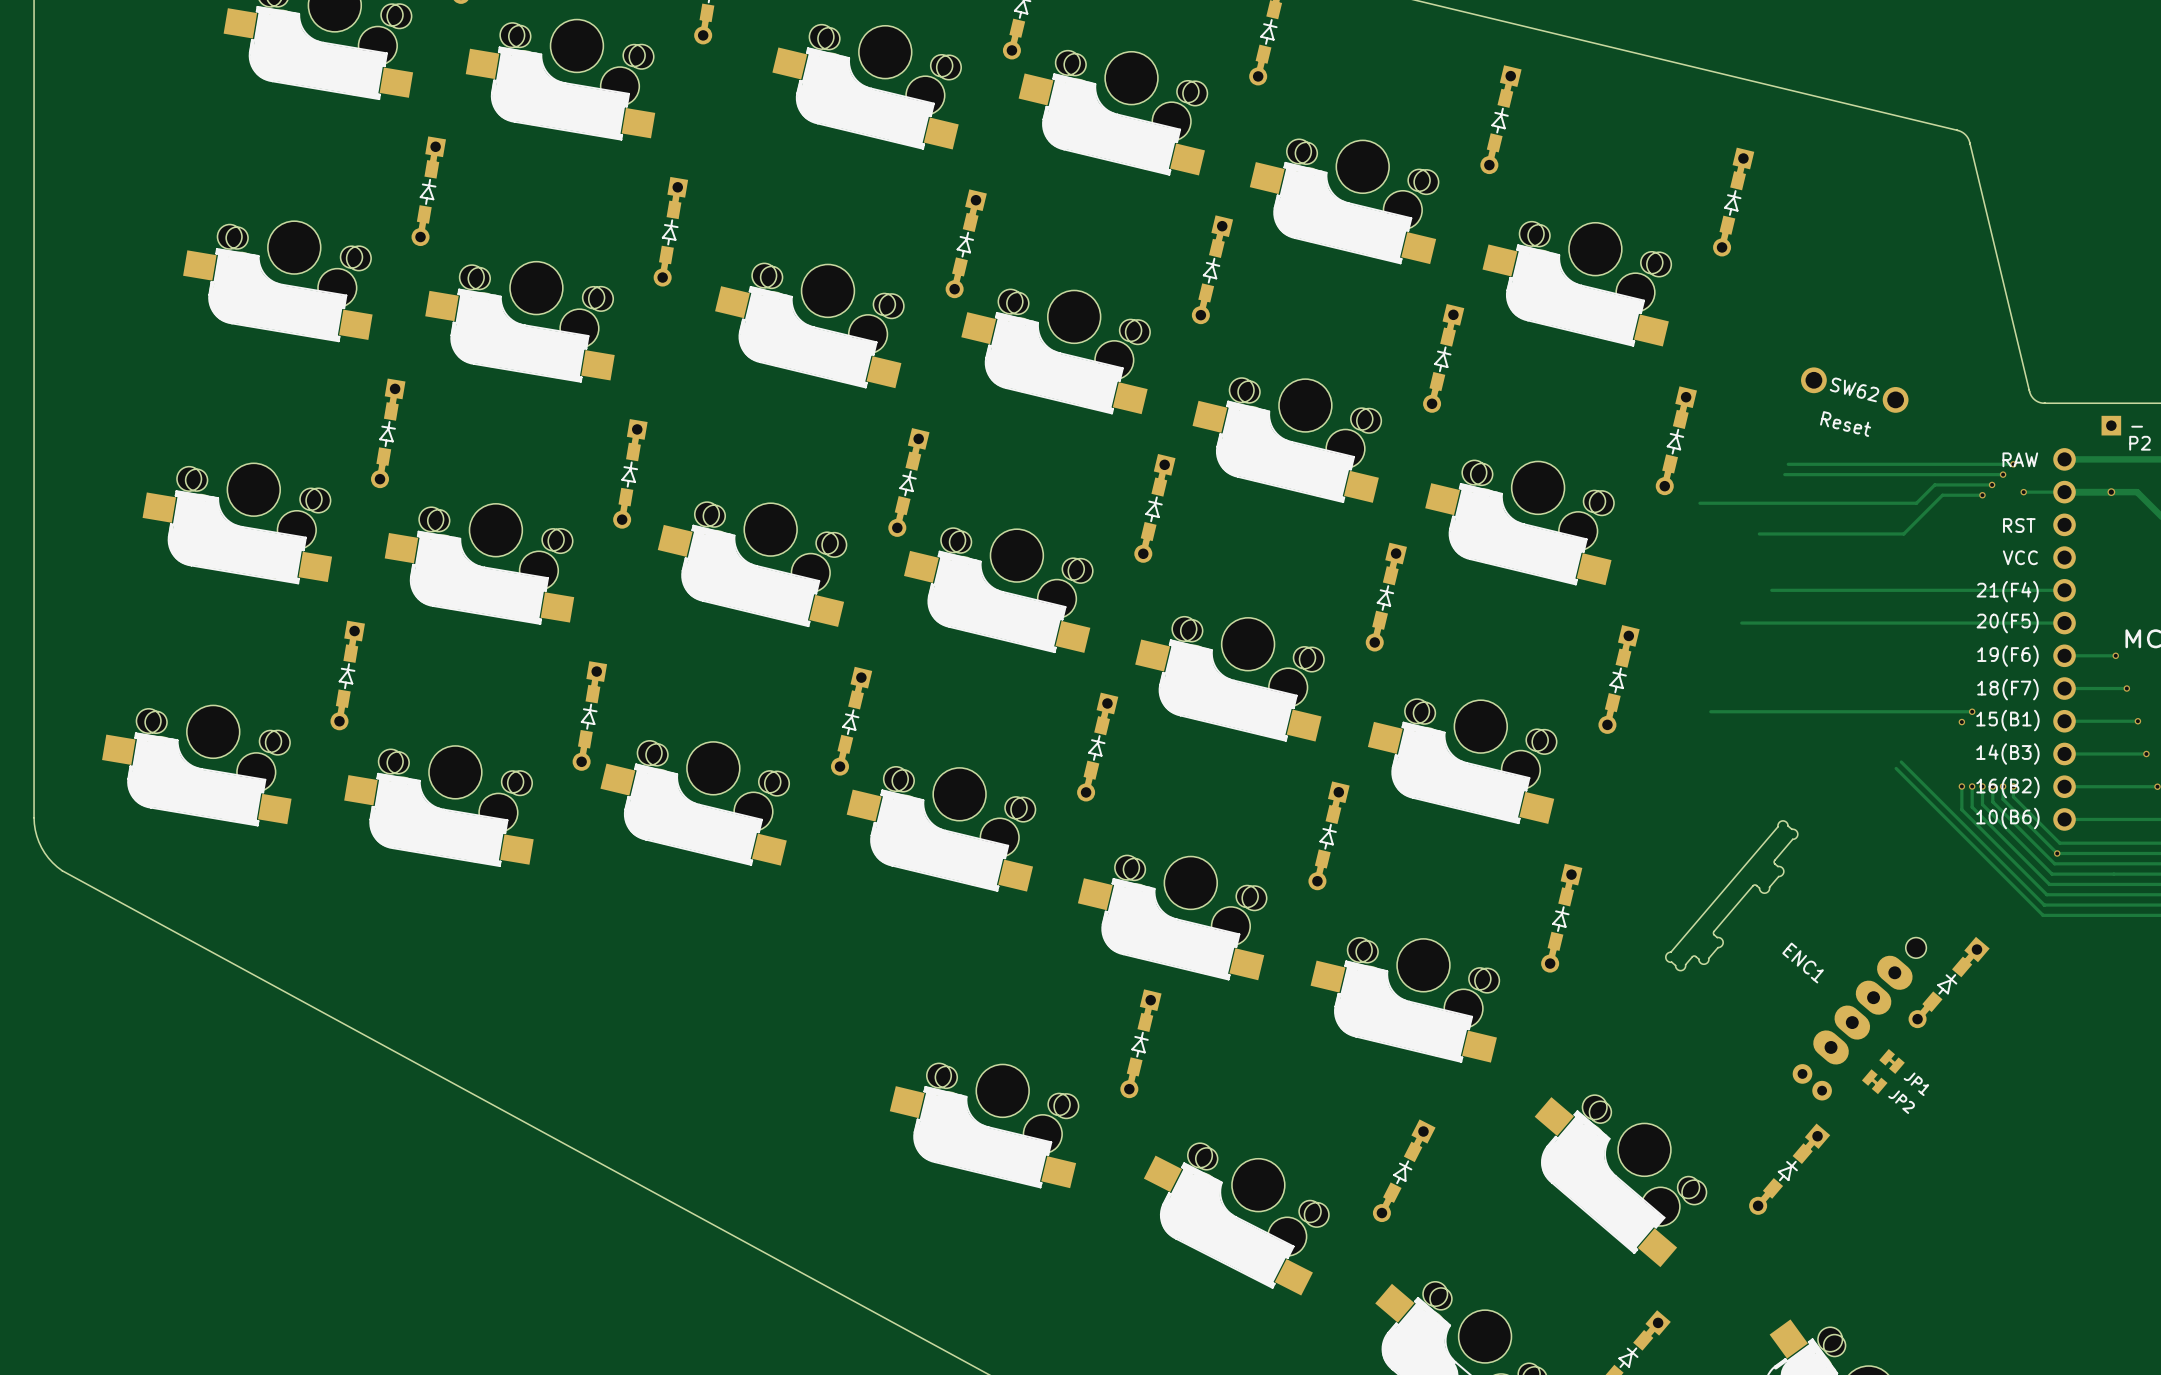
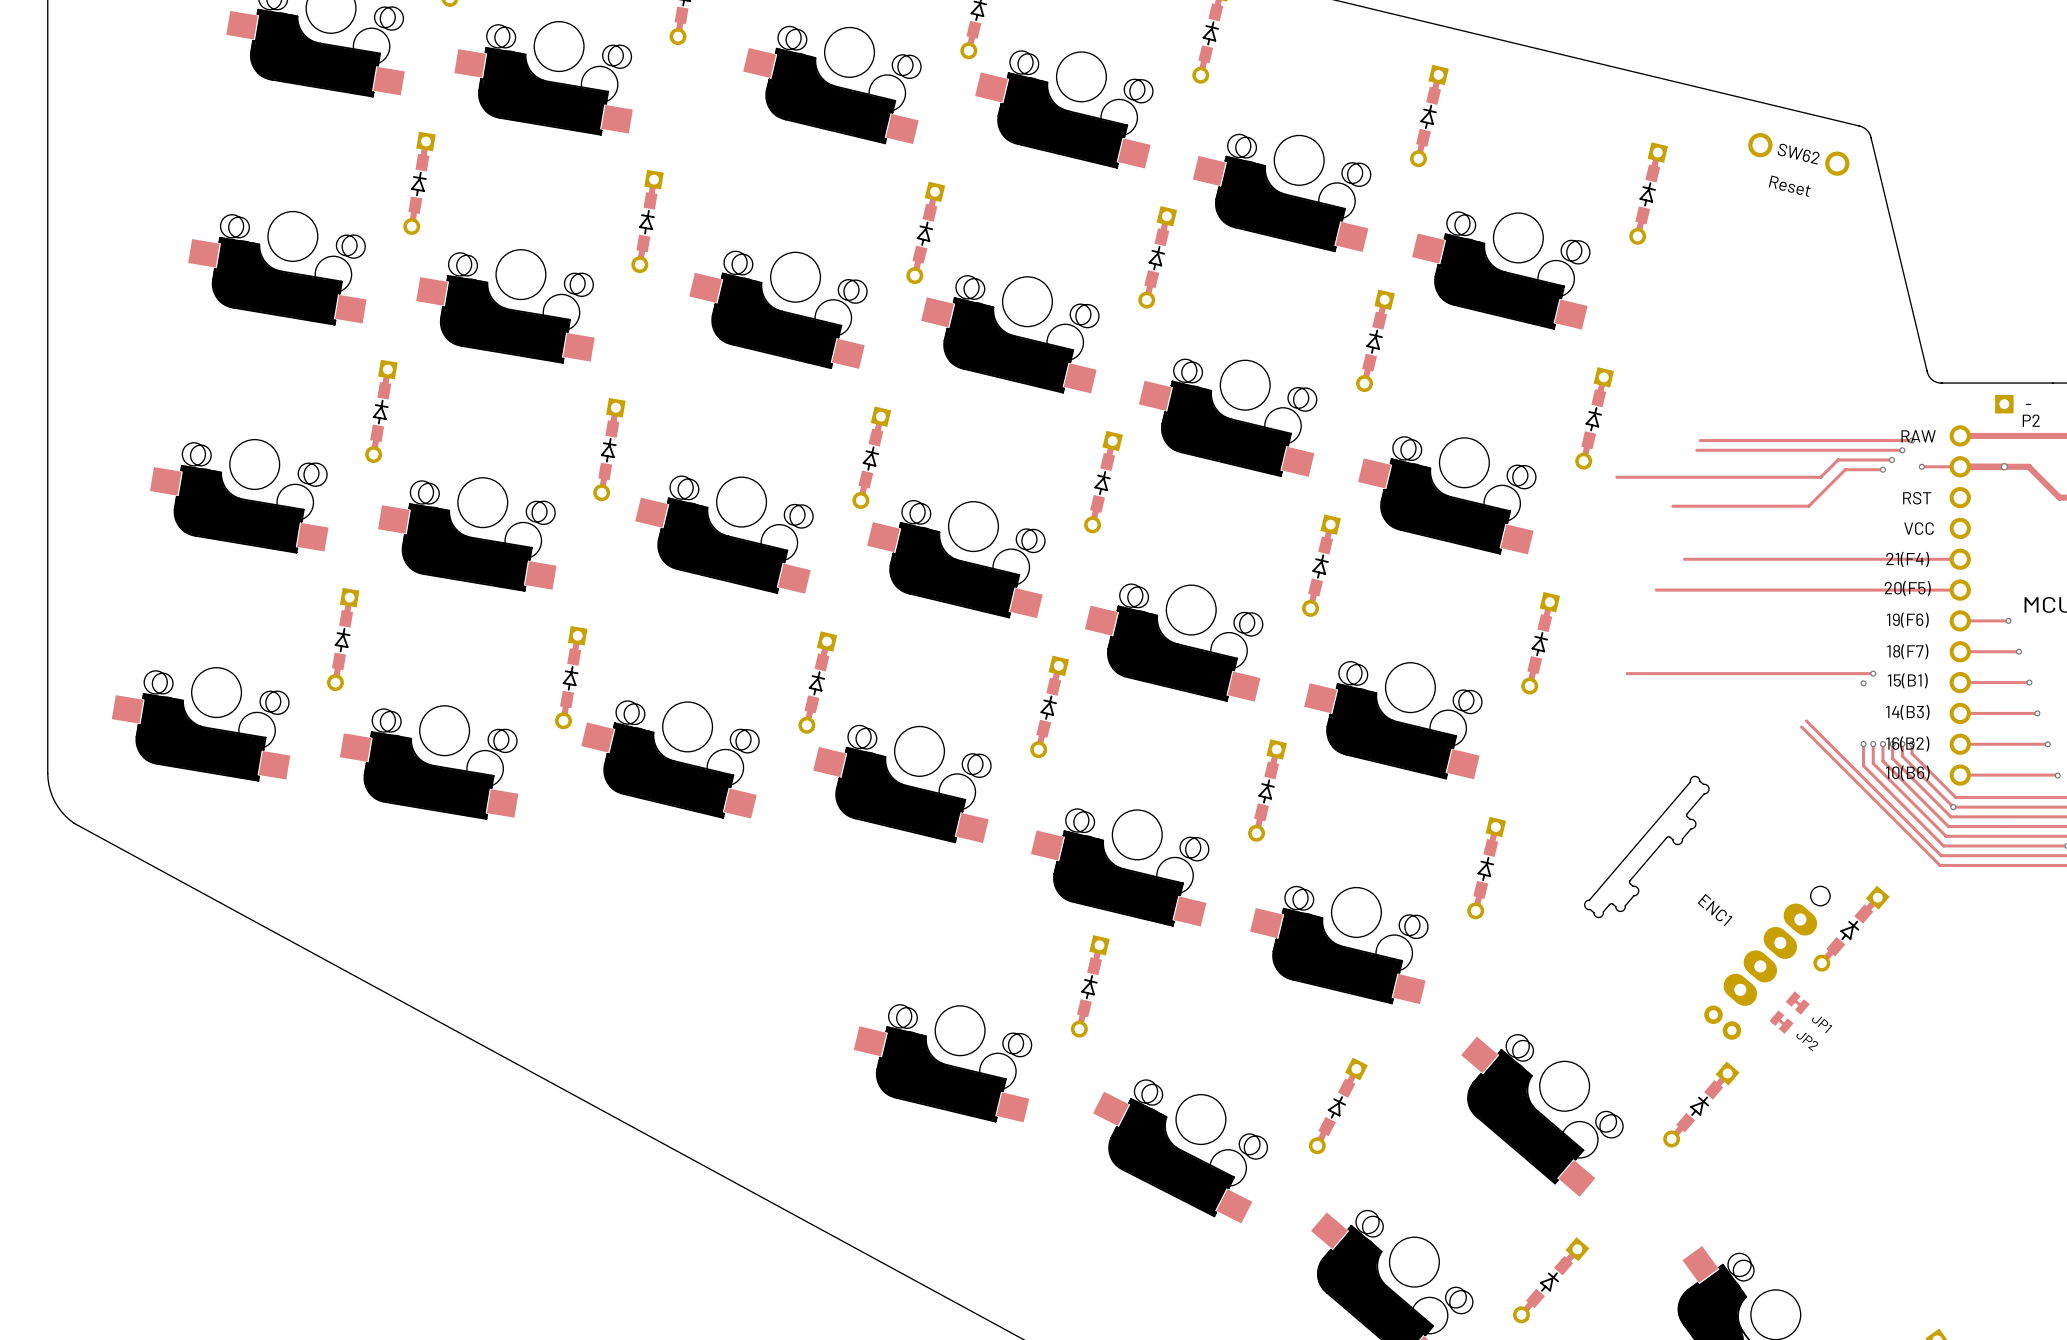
SW62 position: (1854, 390) -> (1798, 154)
text position: Reset (1845, 424) -> Reset (1789, 186)

